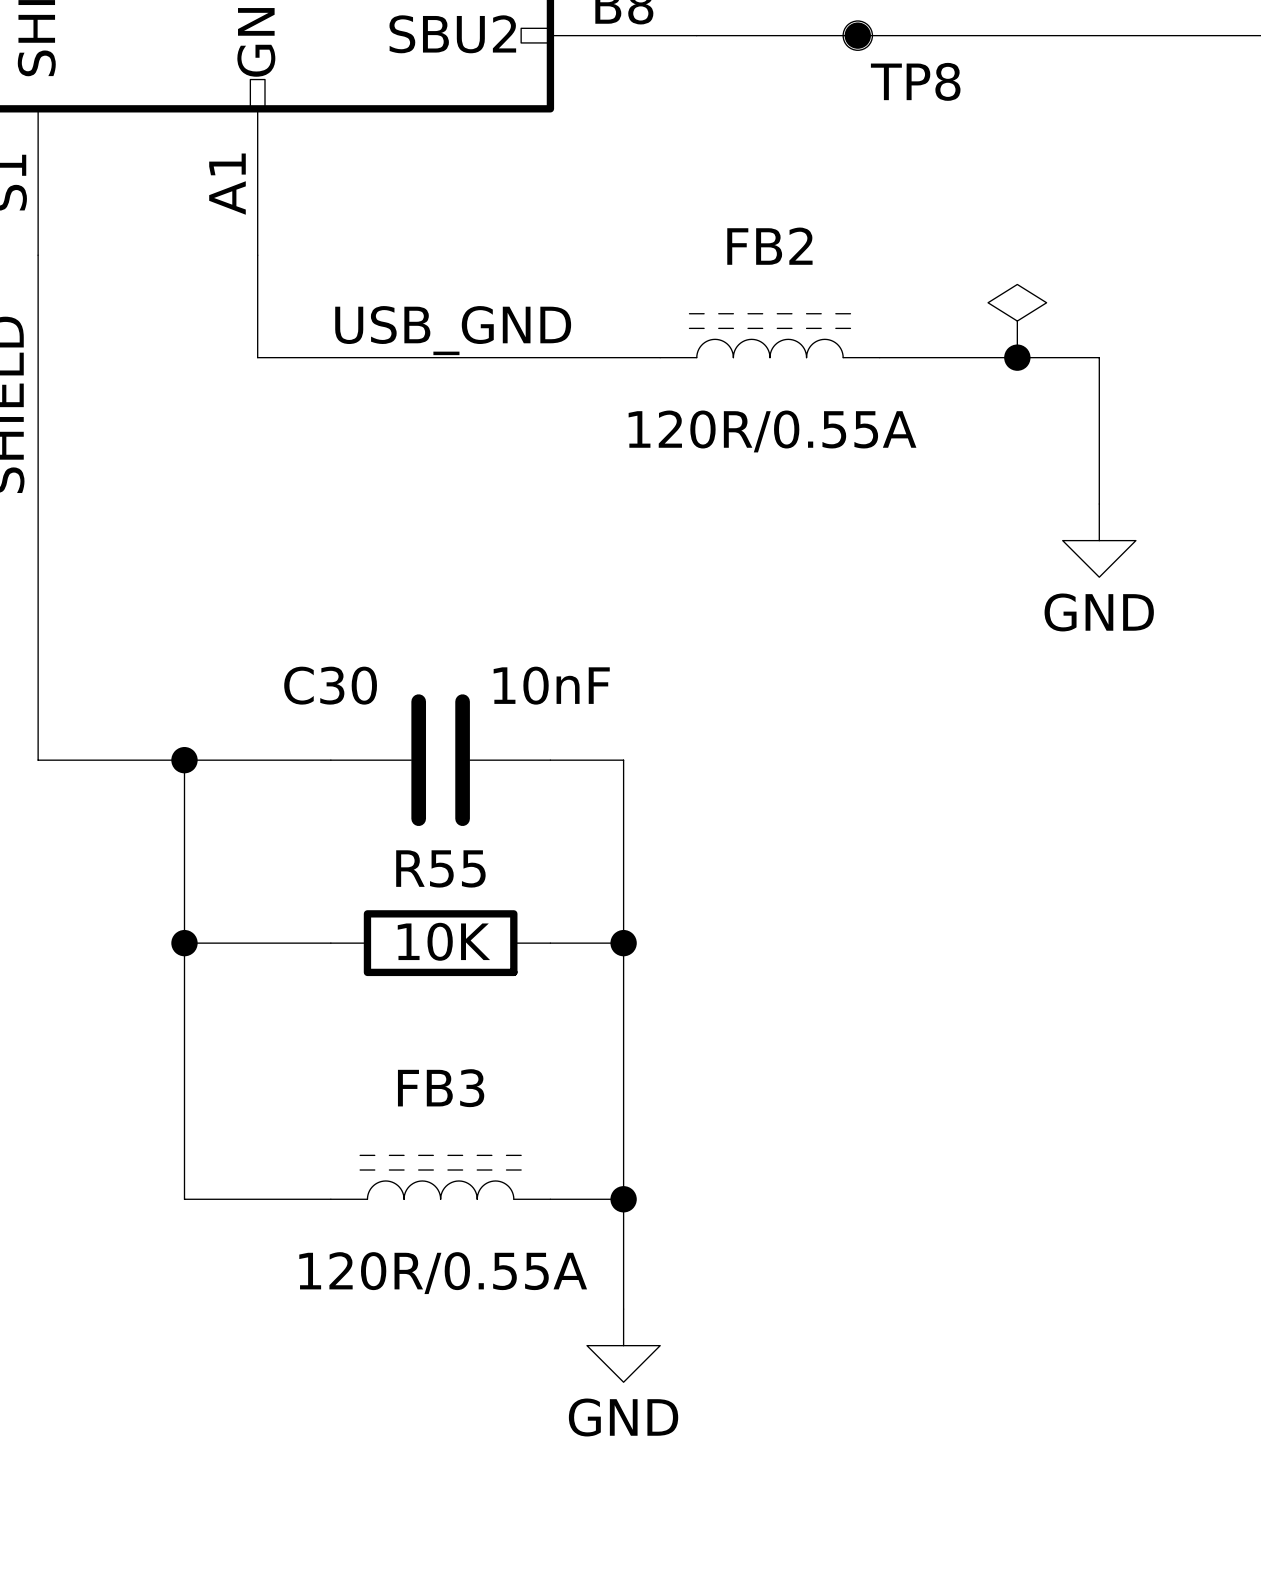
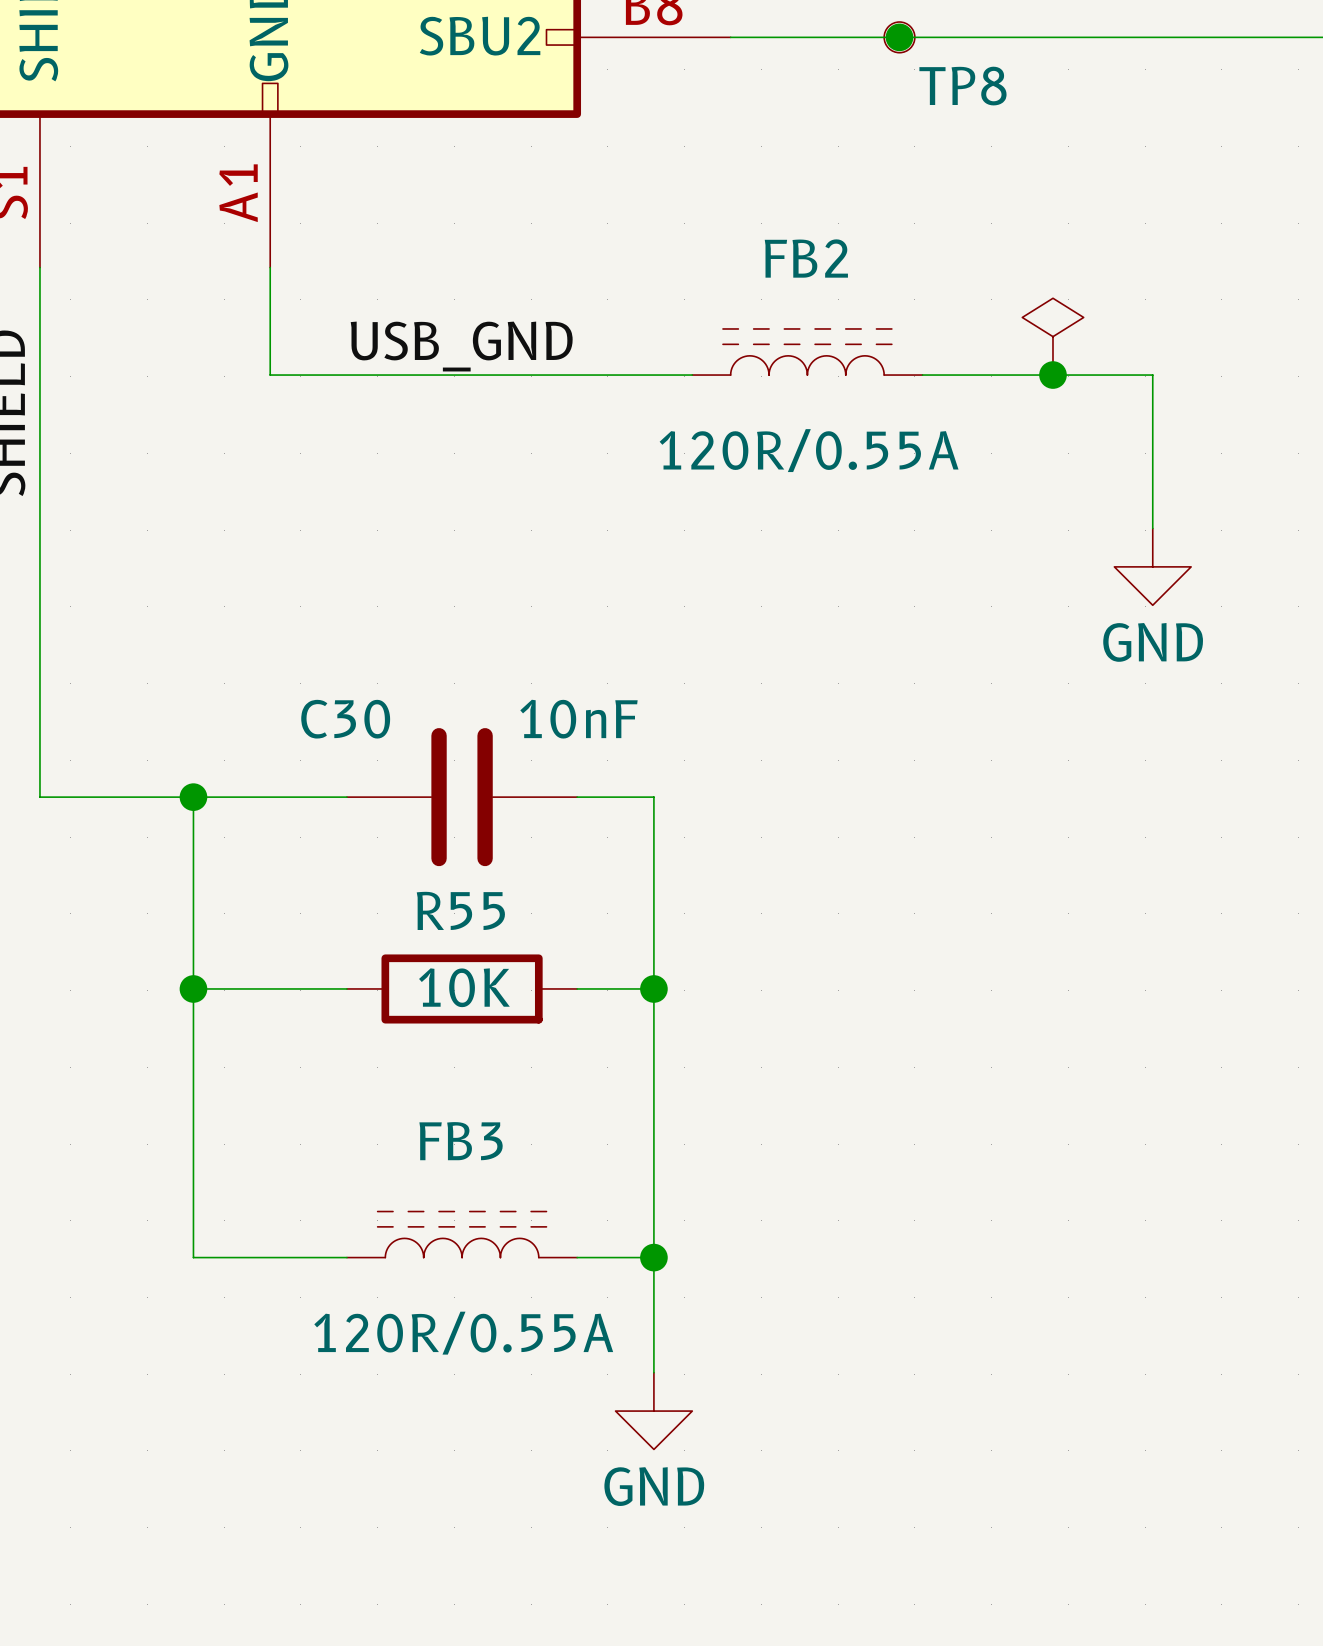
power symbol position: (1017, 321) -> (1052, 336)
junction position: (1017, 357) -> (1052, 375)

